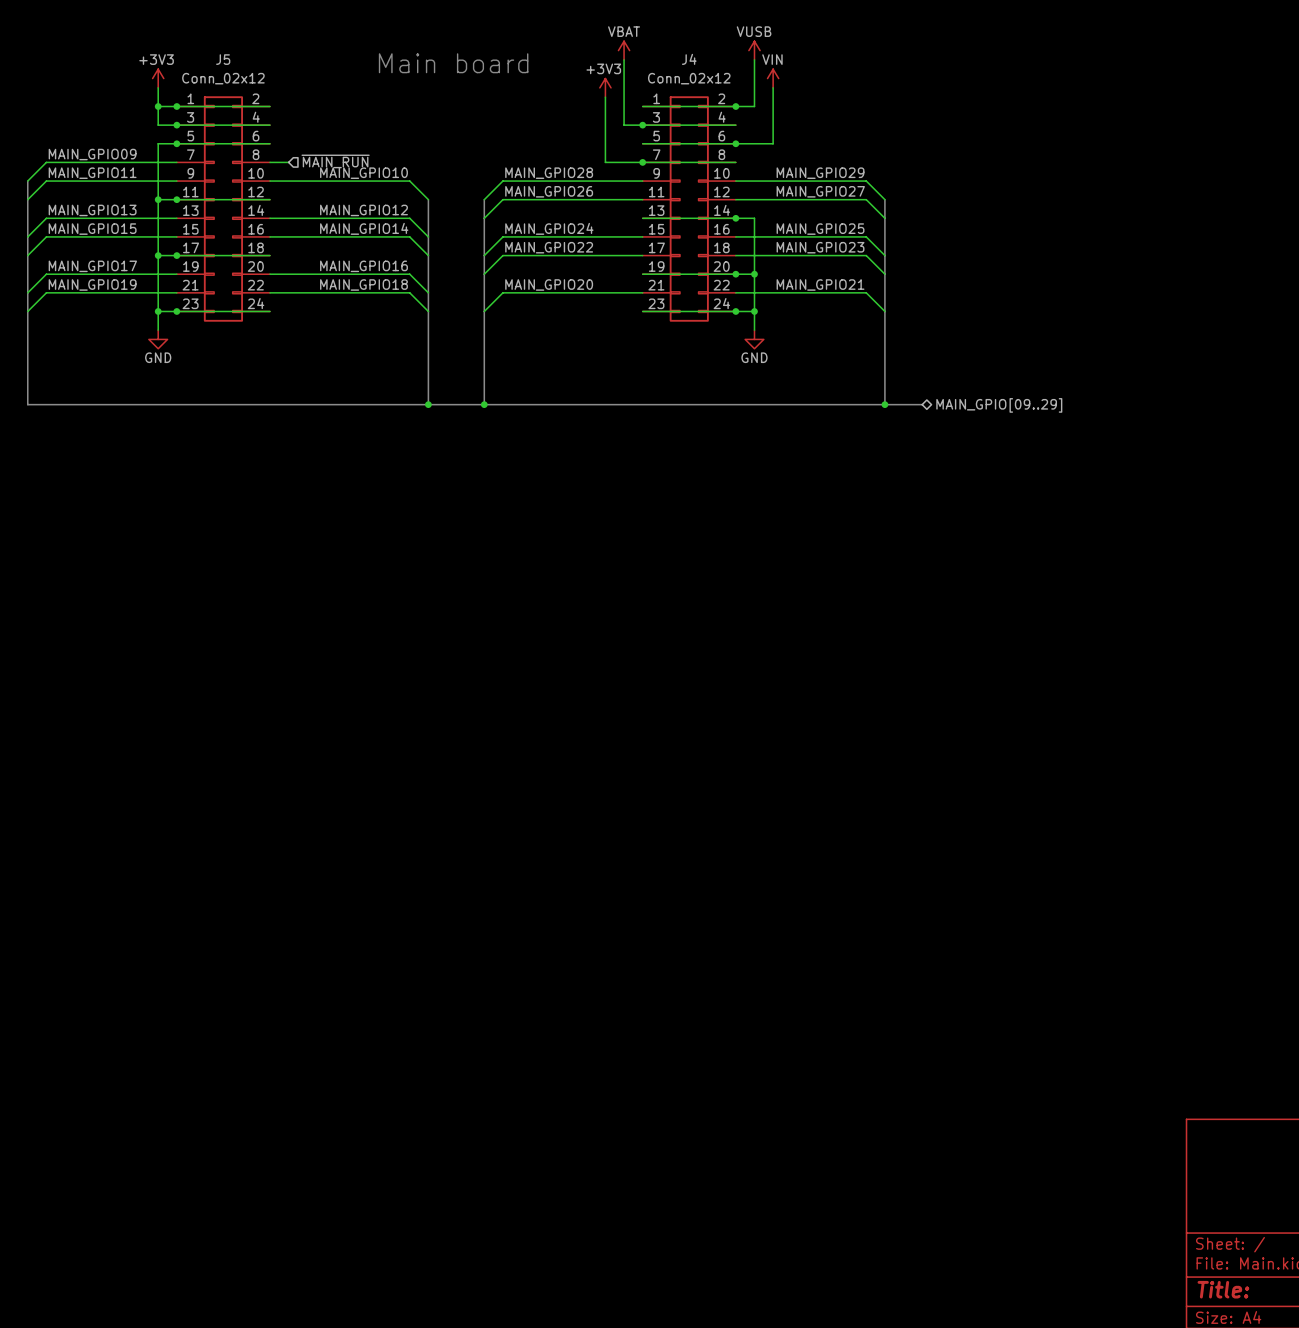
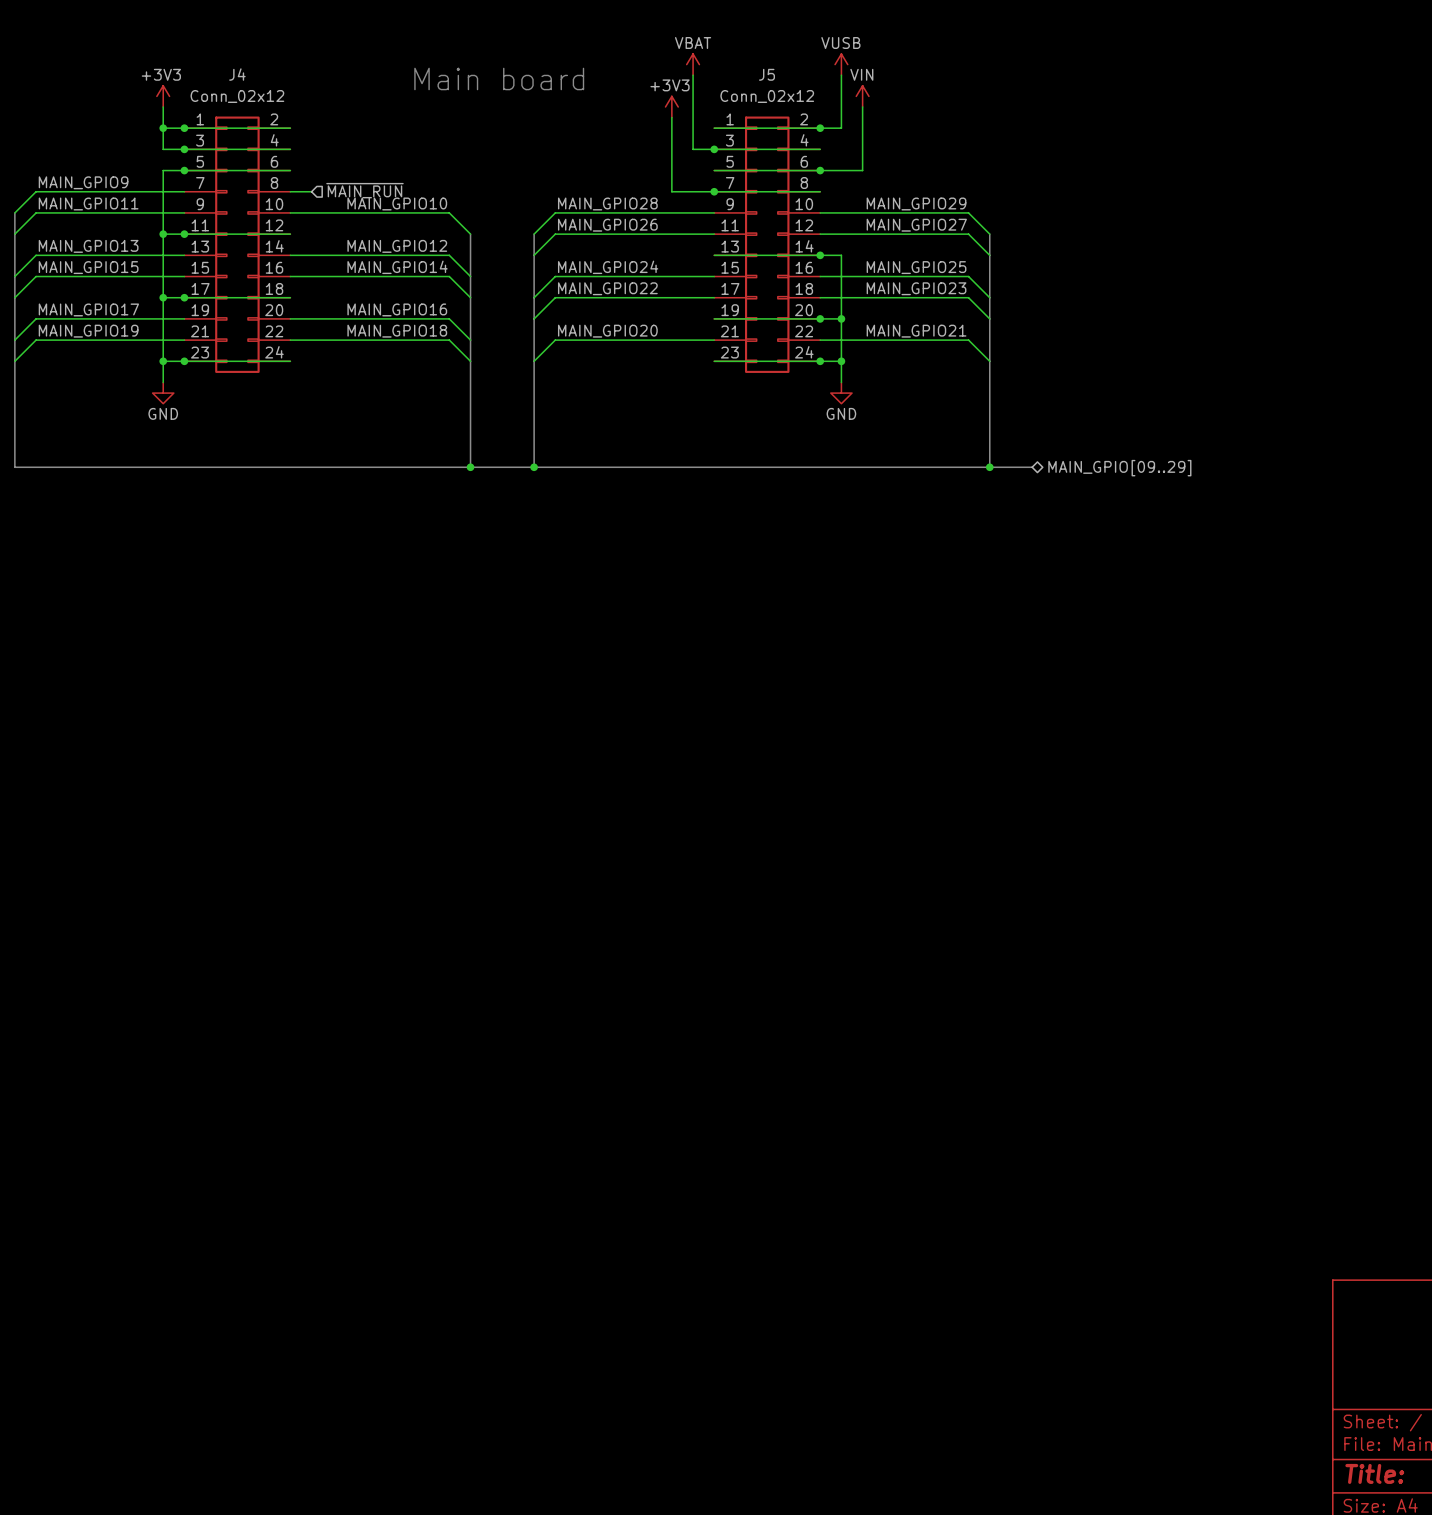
J5 name: J5 (223, 59) -> J4 (237, 74)
J4 name: J4 (689, 59) -> J5 (766, 74)
label: MAIN_GPIO09 (92, 154) -> MAIN_GPIO9 (83, 182)

